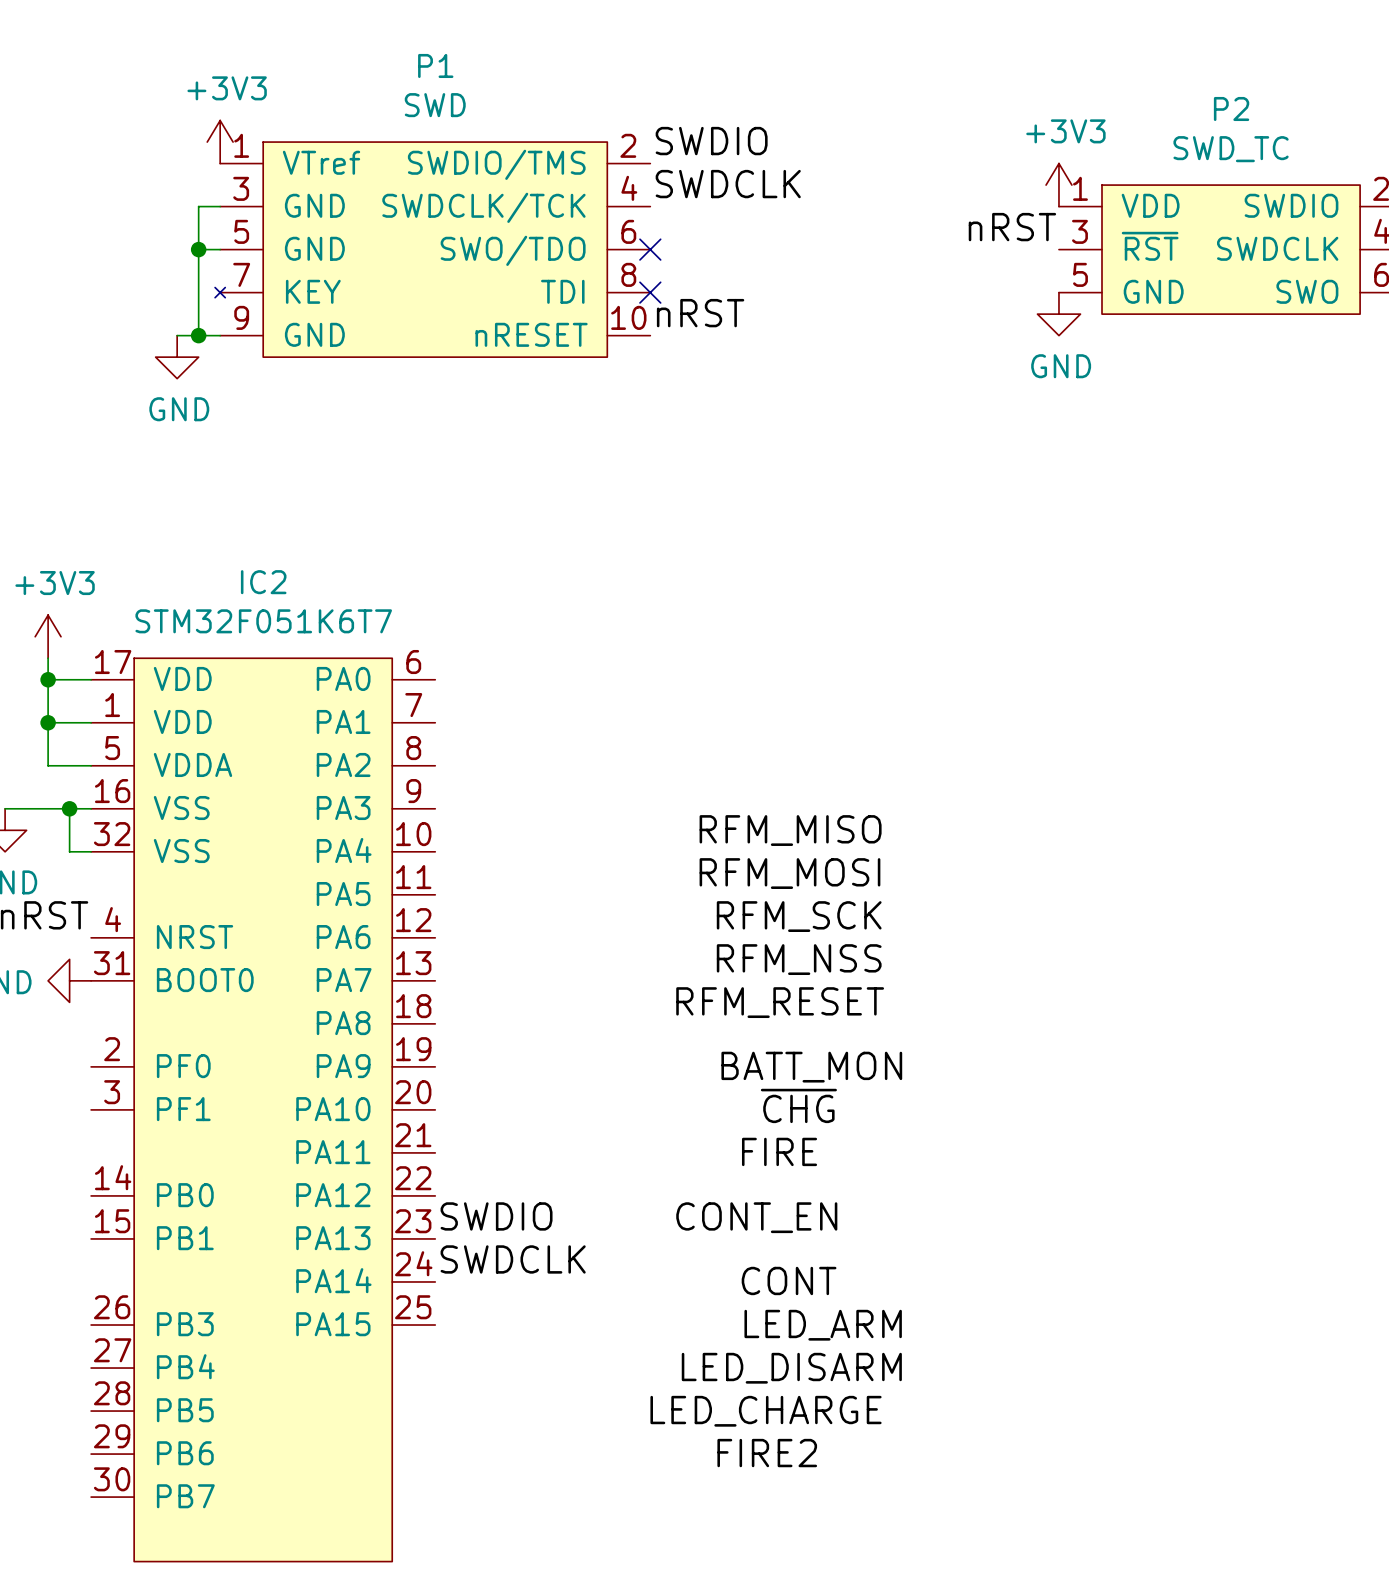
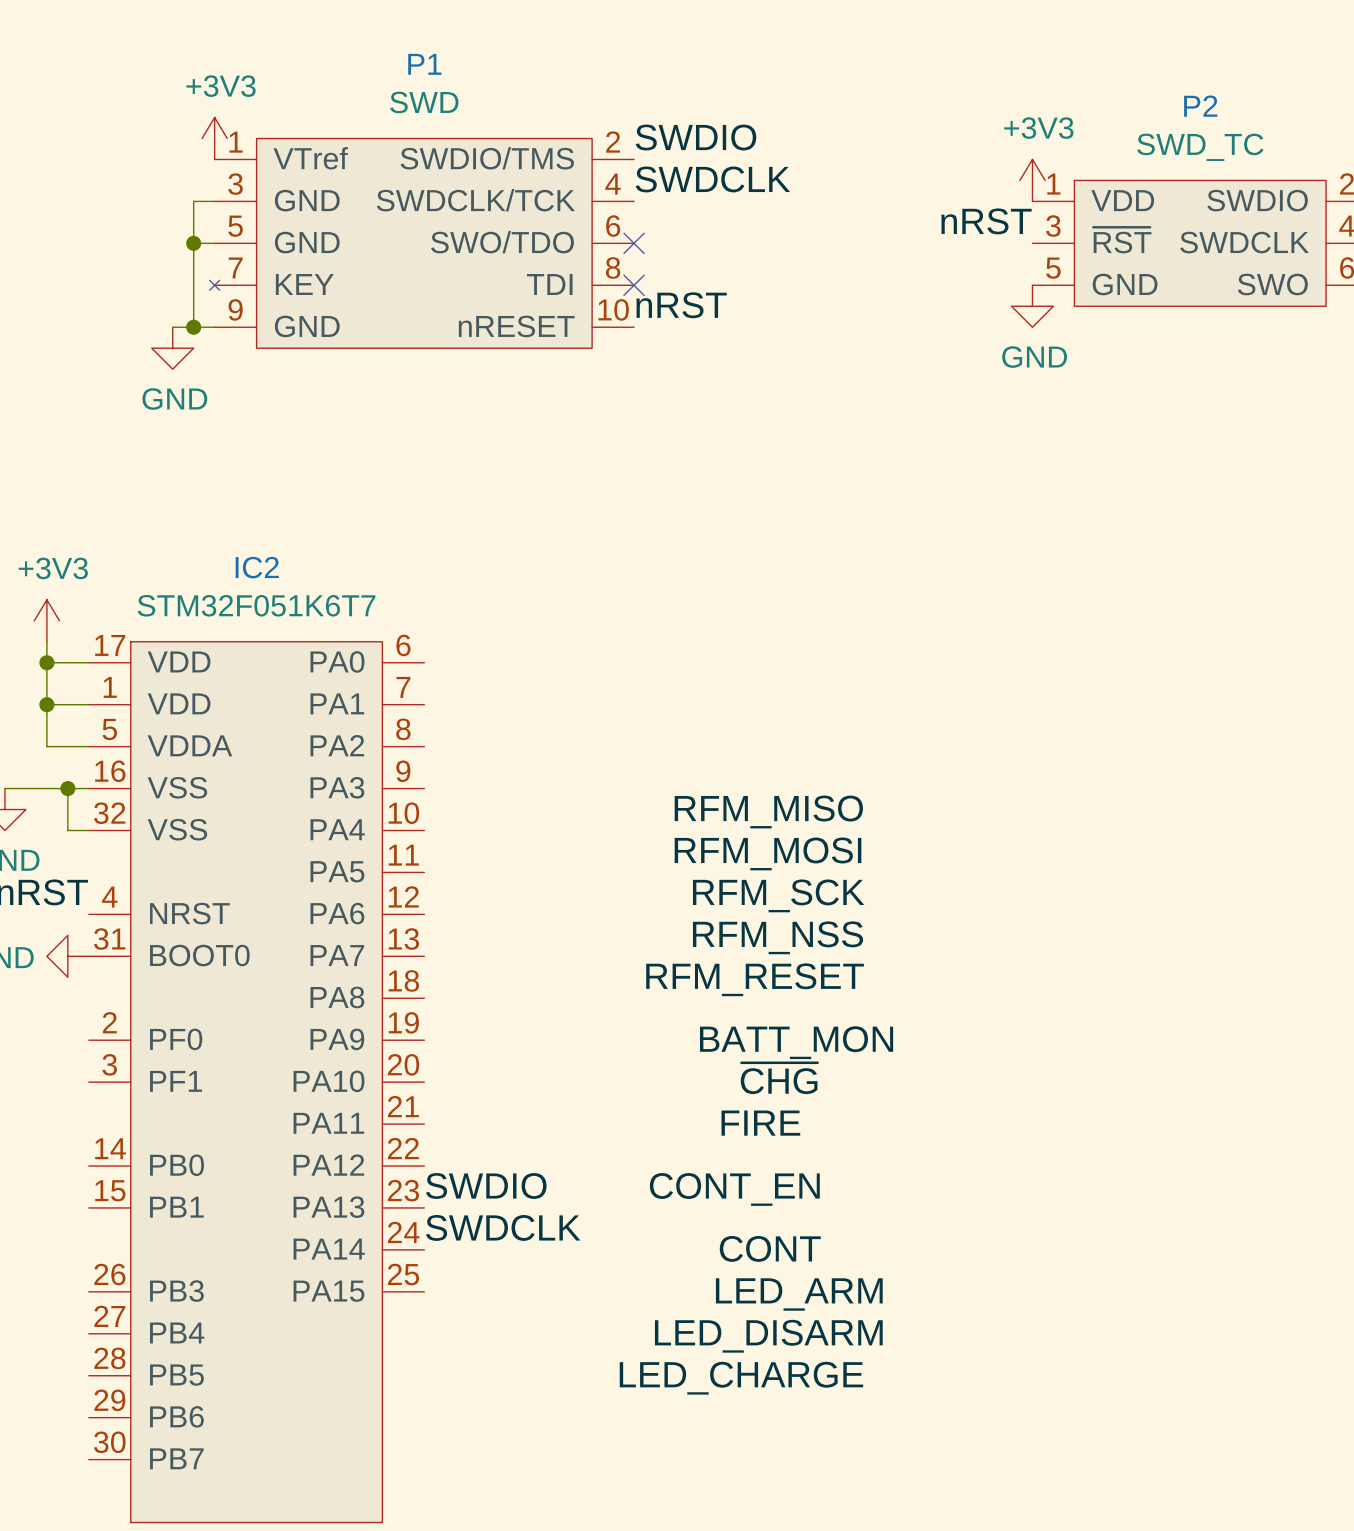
label: FIRE2 (767, 1453) -> none

